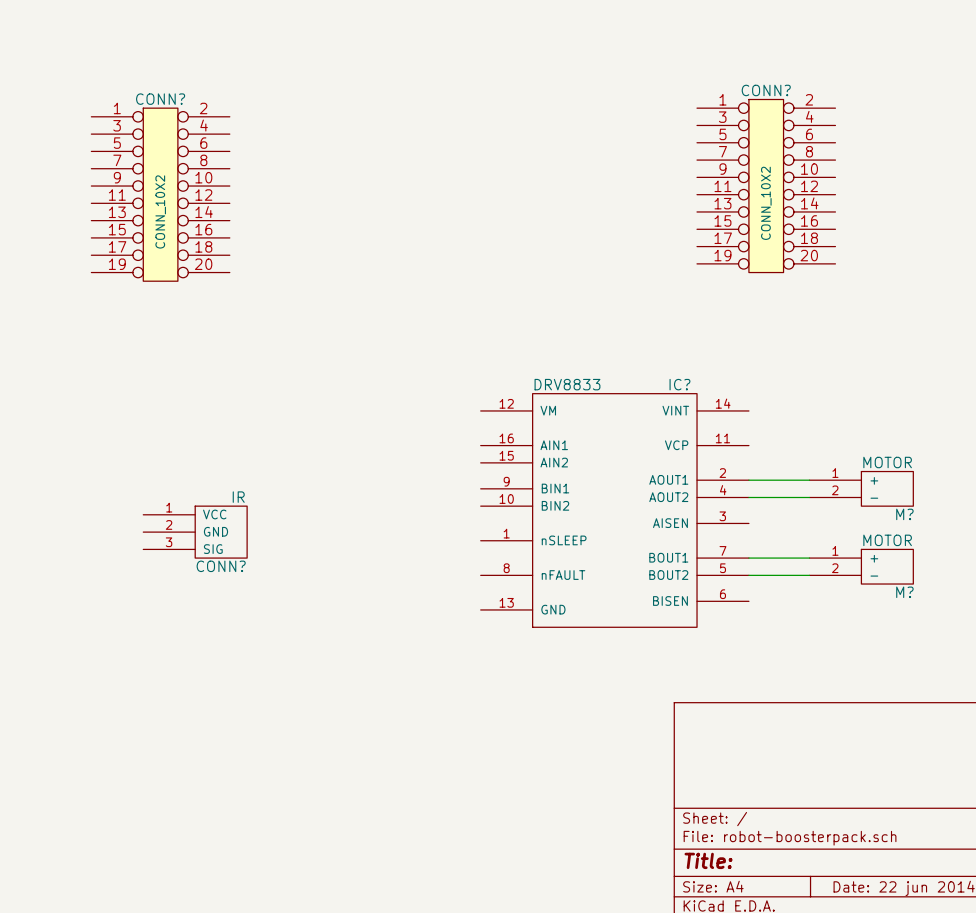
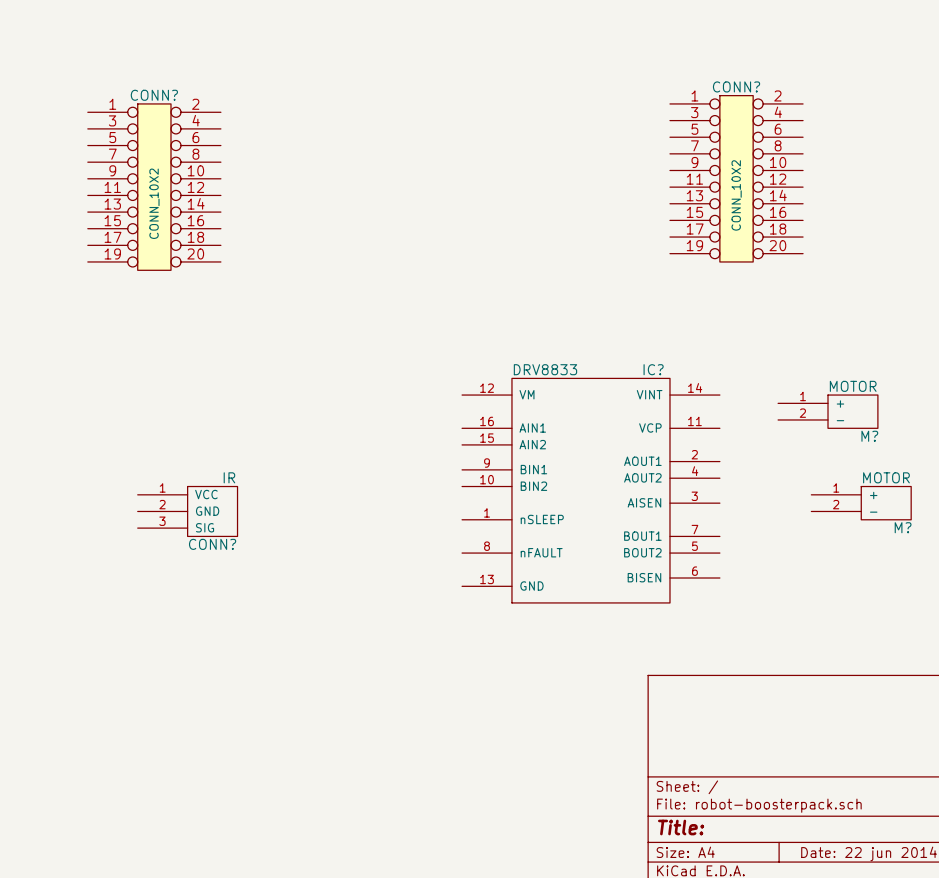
M?: none -> MOTOR (828, 411)
wire: (748, 480) (809, 480) -> none
M?: MOTOR (861, 488) -> none
wire: (748, 497) (809, 497) -> none
M?: none -> MOTOR (861, 503)
wire: (748, 558) (809, 558) -> none
M?: MOTOR (861, 566) -> none
wire: (748, 575) (809, 575) -> none

